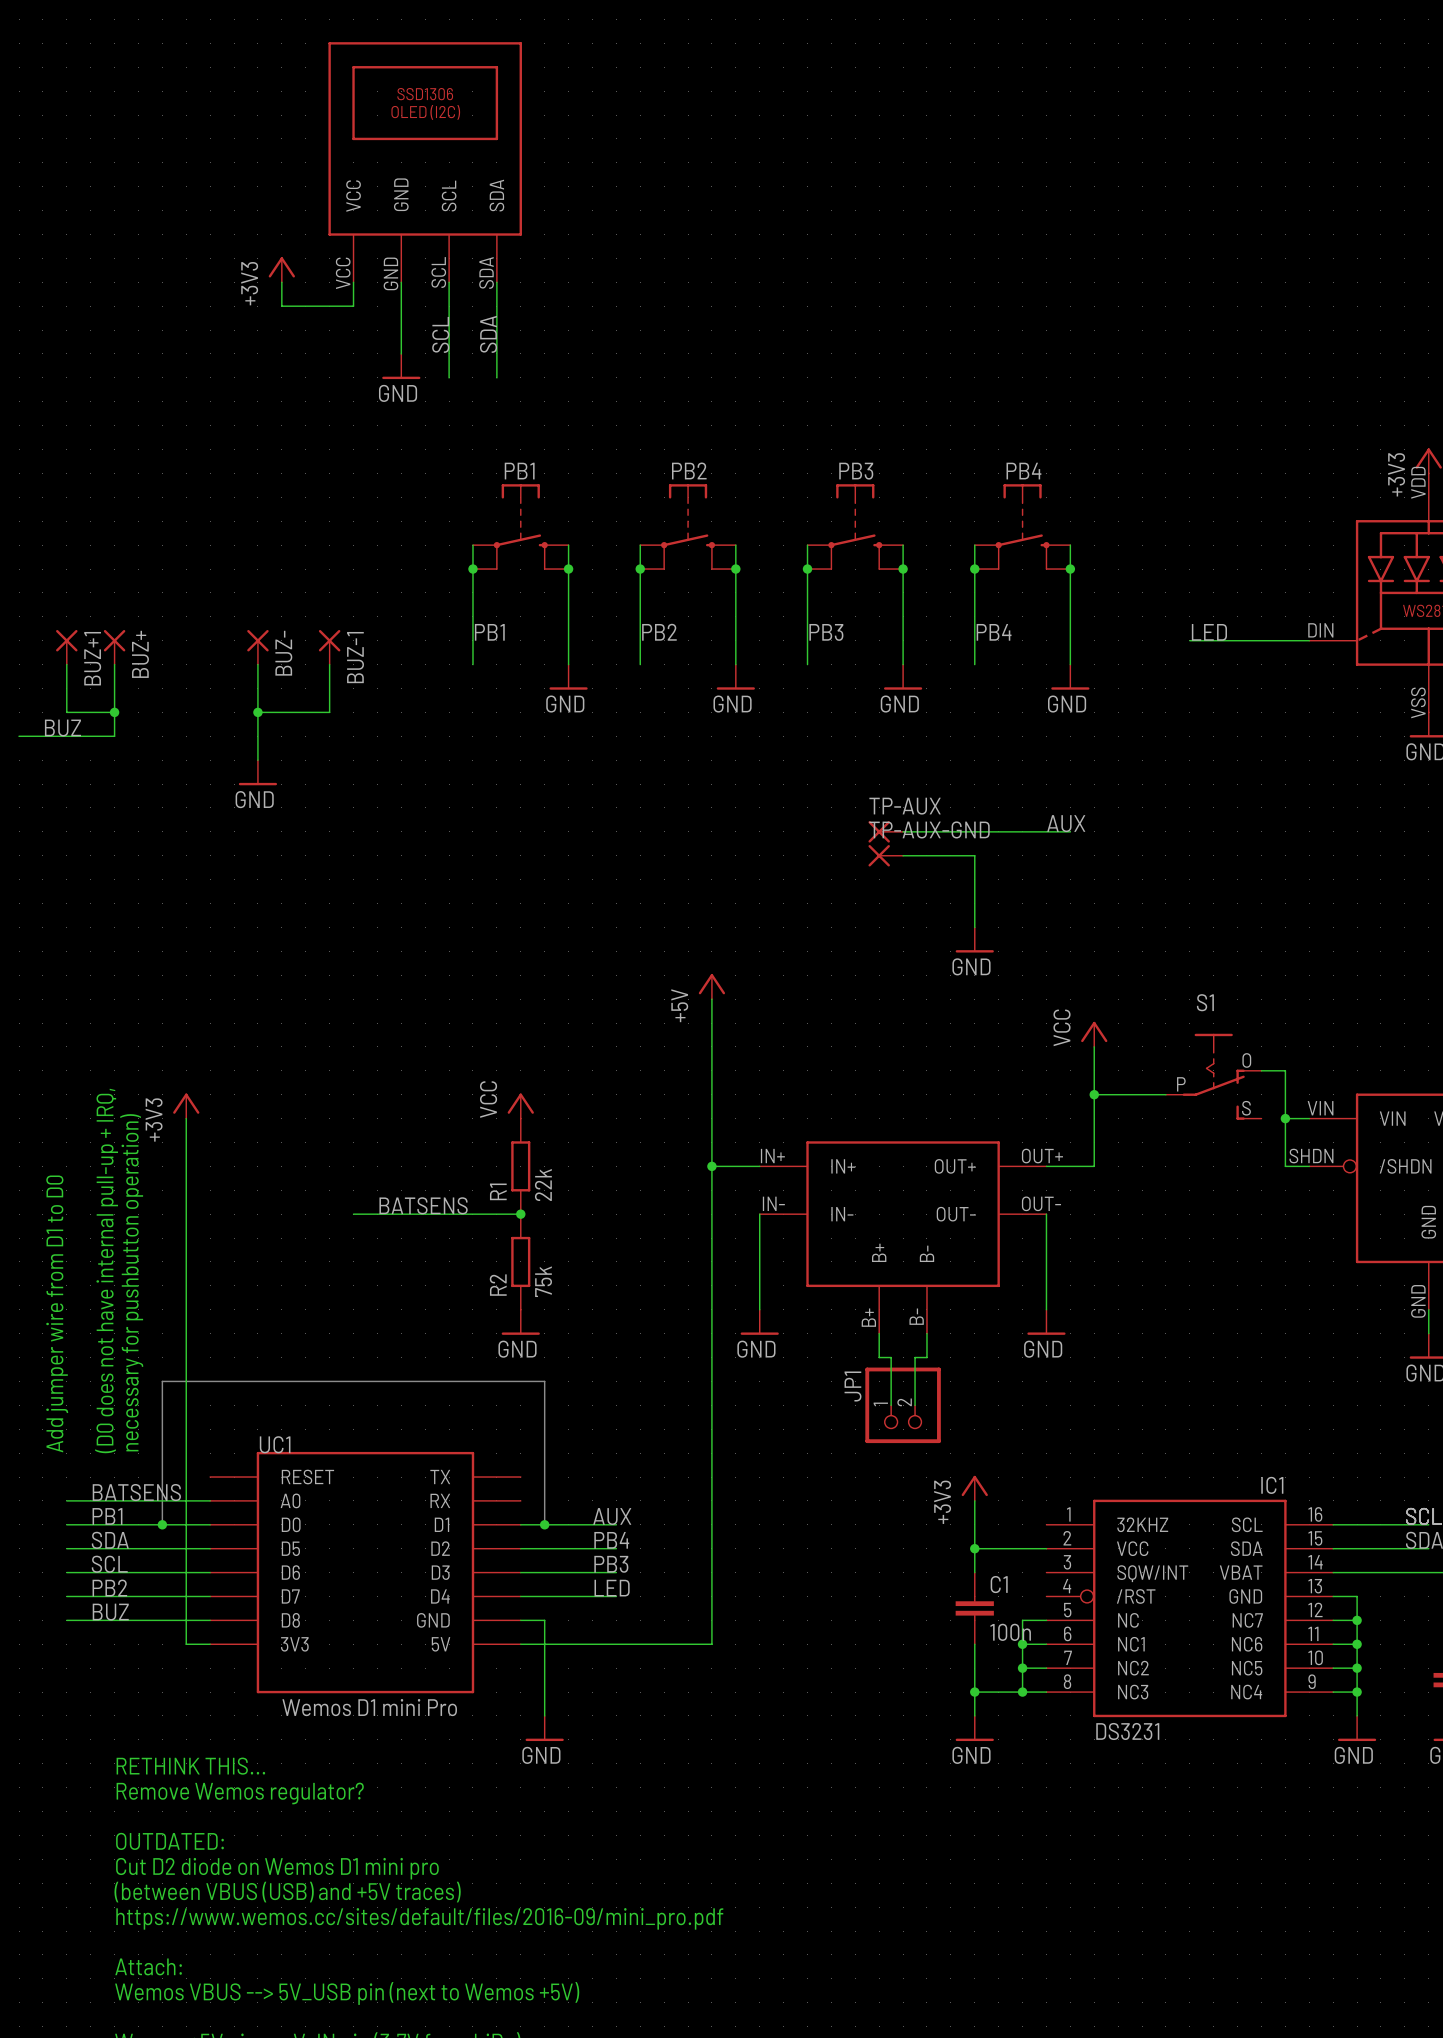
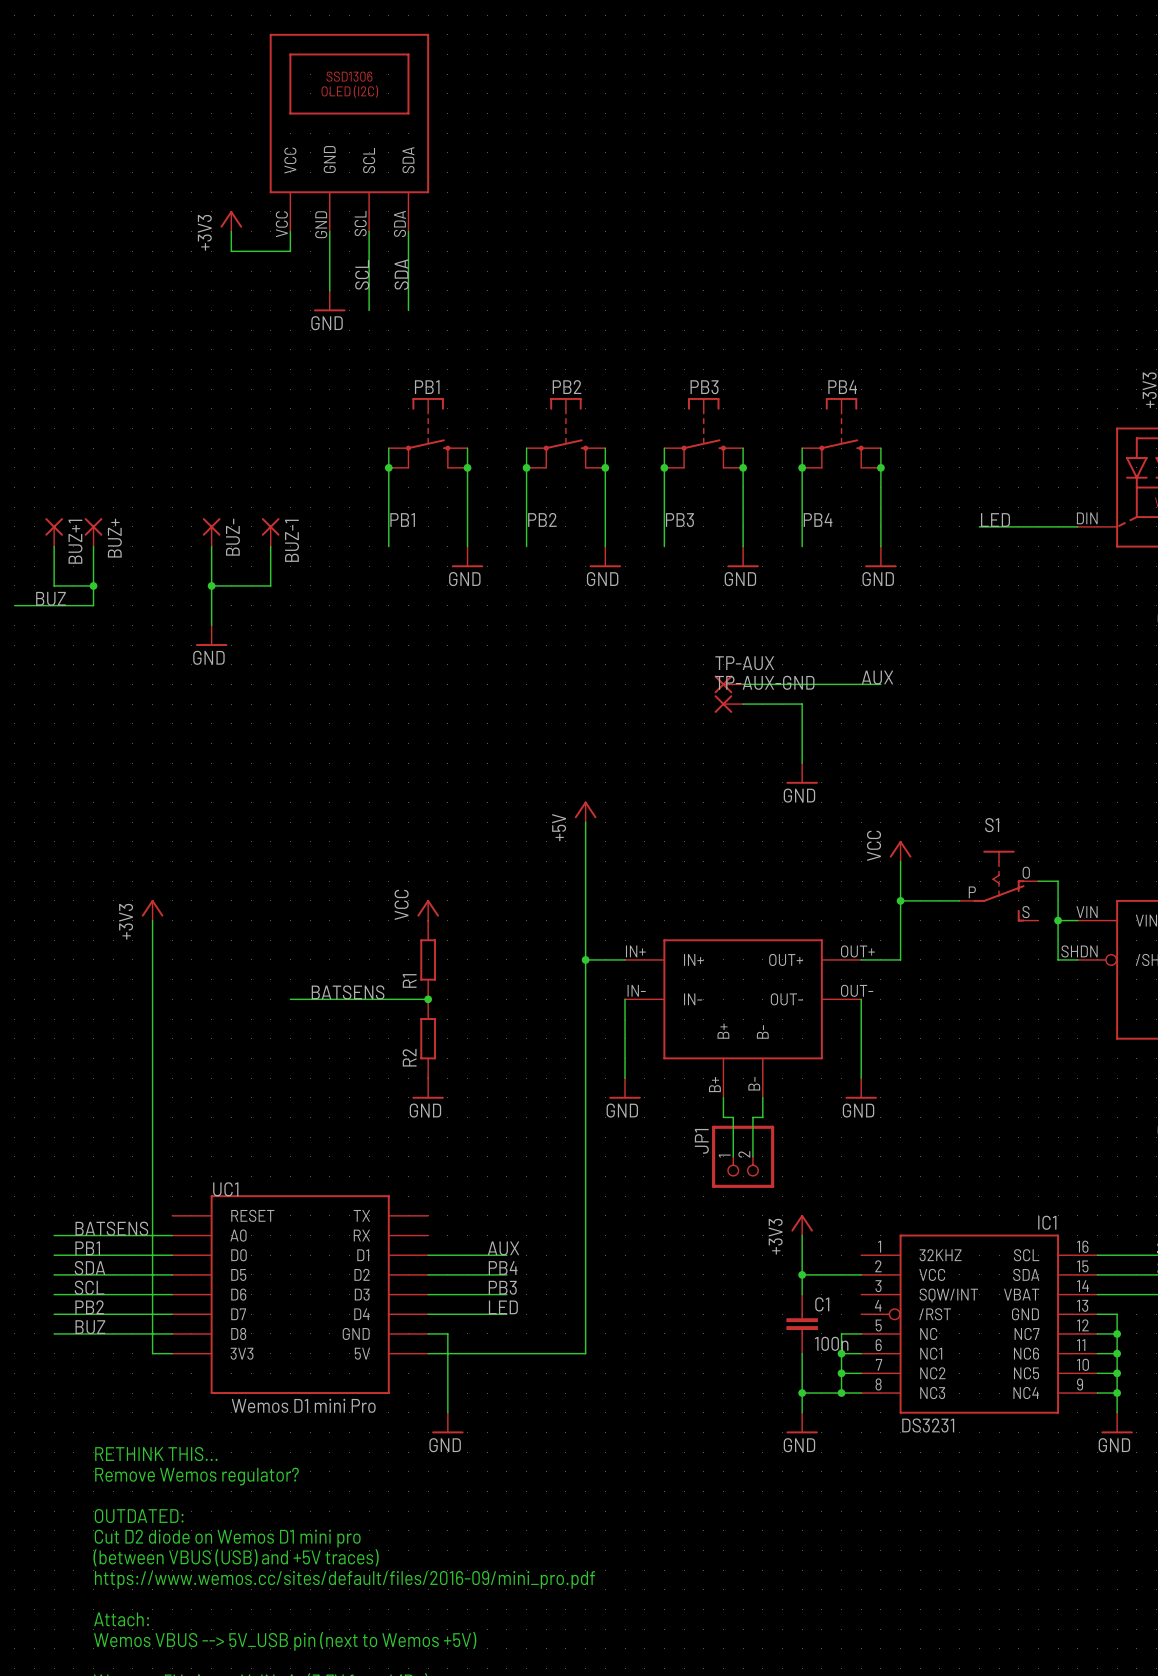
R1 value: 22k (543, 1185) -> none
text: (D0 does not have internal pull-up + IRQ, (106, 1270) -> none
R2 value: 75k (543, 1281) -> none
text: necessary for pushbutton operation) (131, 1282) -> none
text: Add jumper wire from D1 to D0 (57, 1313) -> none
line: (162, 1524) (162, 1381) (544, 1381) (544, 1524) -> none
junction: (162, 1524) -> none
junction: (544, 1524) -> none

